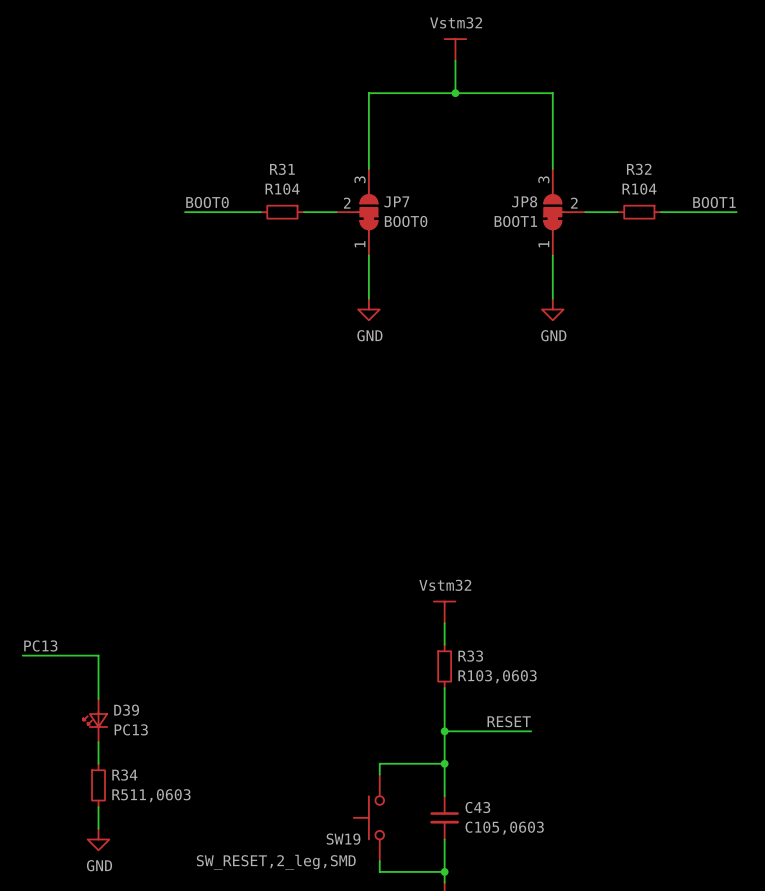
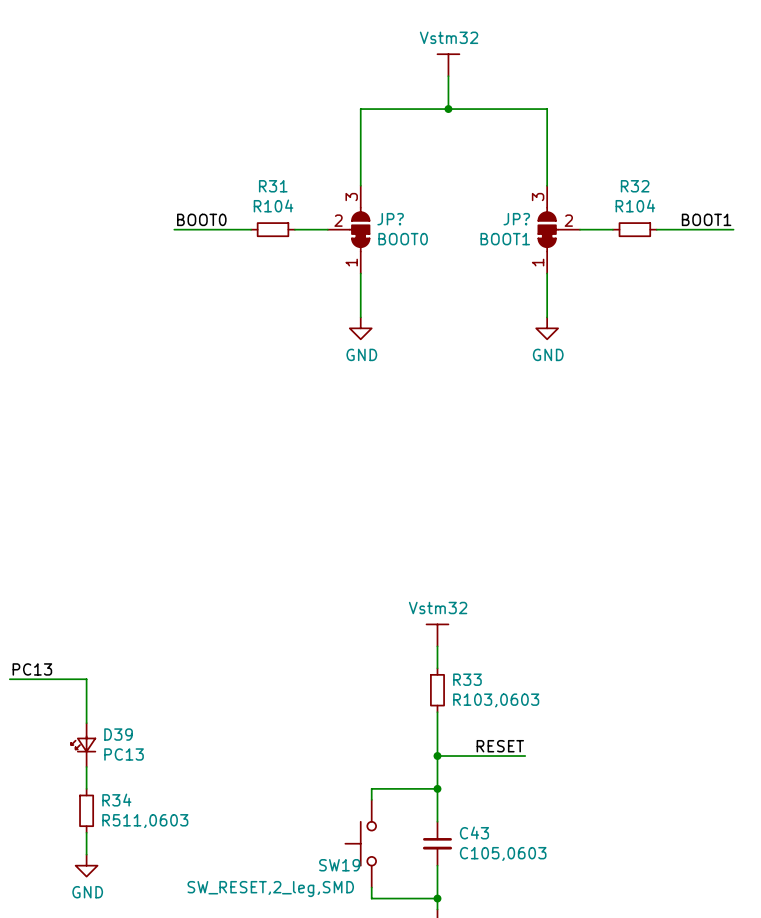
JP7 name: JP7 (396, 201) -> JP? (390, 219)
JP8 name: JP8 (524, 201) -> JP? (516, 219)

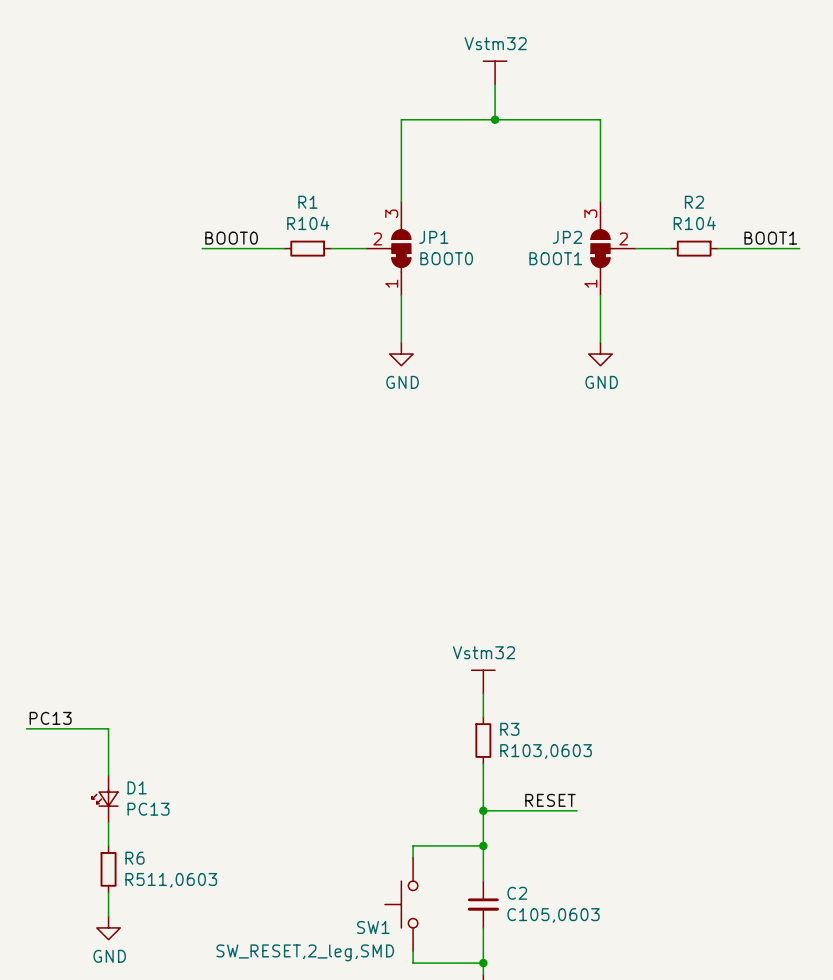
R31 name: R31 (273, 186) -> R1 (307, 202)
R32 name: R32 (635, 186) -> R2 (694, 202)
JP? name: JP? (390, 219) -> JP1 (433, 237)
JP? name: JP? (516, 219) -> JP2 (567, 237)
R33 name: R33 (467, 679) -> R3 (509, 729)
D39 name: D39 (118, 734) -> D1 (137, 787)
R34 name: R34 (116, 800) -> R6 (135, 858)
C43 name: C43 (474, 832) -> C2 (517, 893)
SW19 name: SW19 (339, 865) -> SW1 (373, 927)

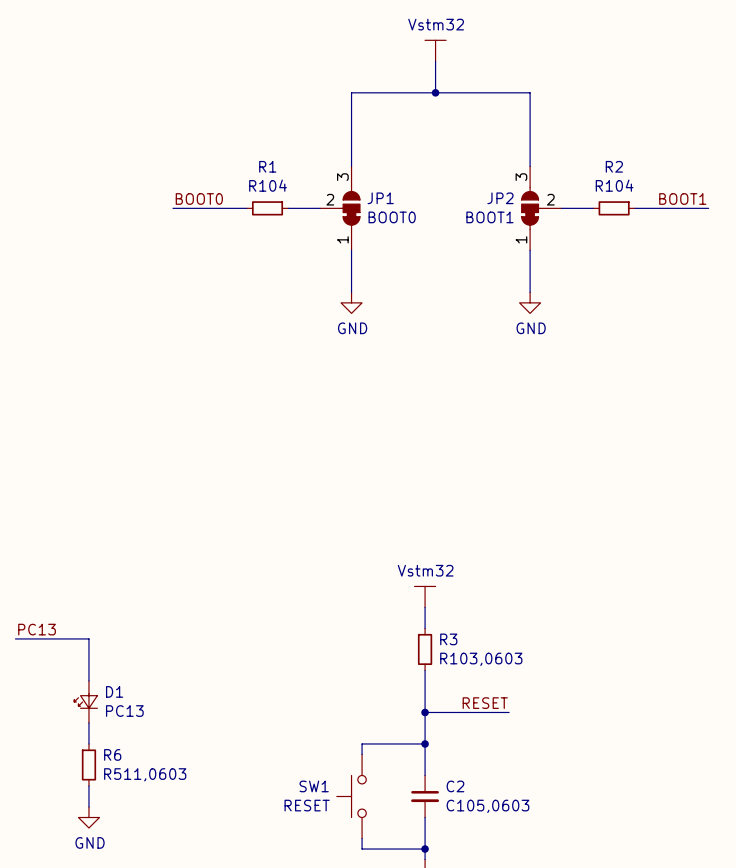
SW1 name position: SW1 (373, 927) -> SW1 (314, 786)
SW1 value: SW_RESET,2_leg,SMD (305, 952) -> RESET (307, 805)

